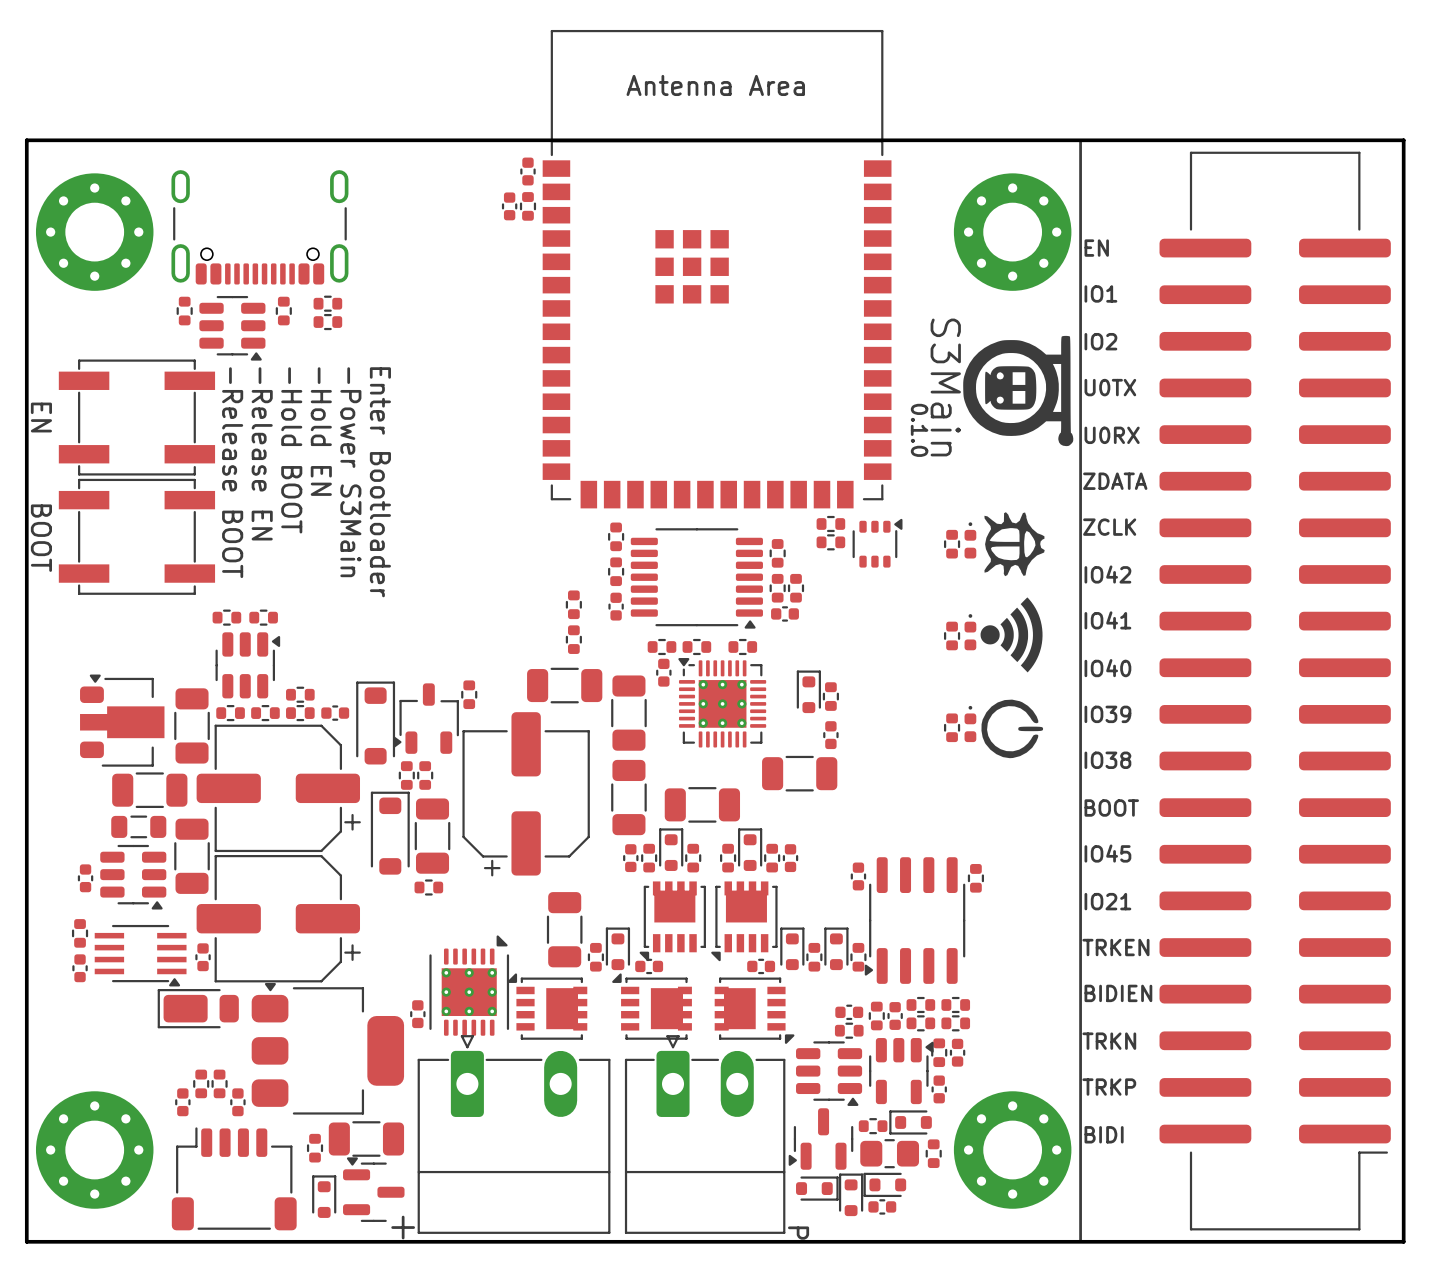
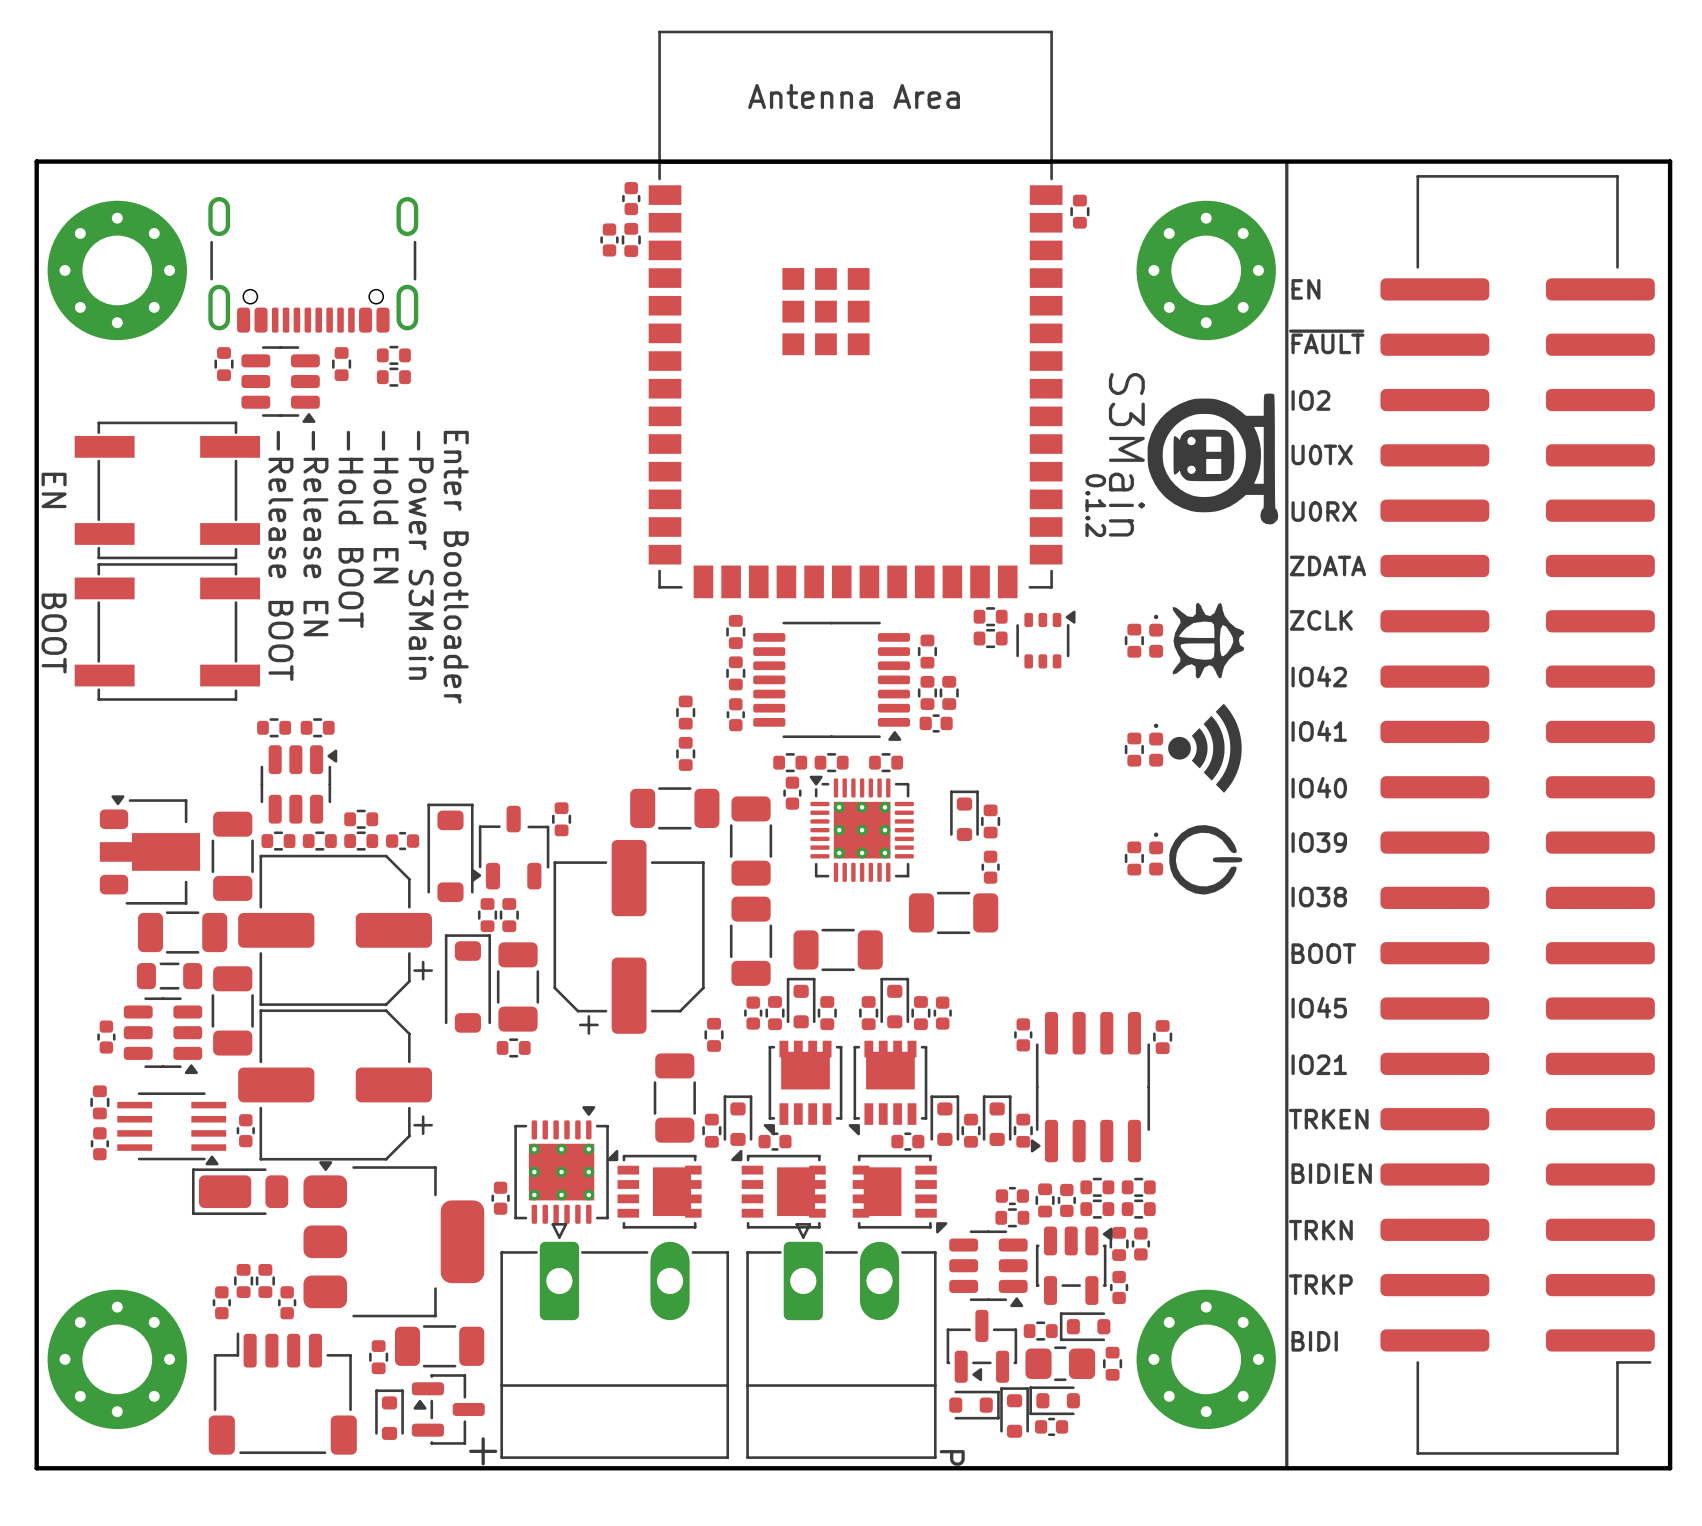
part: none -> (1079, 211)
text: IO1 (1100, 293) -> ~{FAULT} (1326, 341)
text: 0.1.0 (919, 430) -> 0.1.2 (1095, 505)
part: none -> (714, 1034)
part footprint: [429, 935, 510, 1036] -> [514, 1106, 609, 1224]
part footprint: [869, 1038, 934, 1105] -> [1035, 1226, 1113, 1305]
part footprint: [788, 1108, 854, 1170] -> [946, 1309, 1018, 1383]
part footprint: [343, 1157, 405, 1222] -> [411, 1374, 485, 1445]

